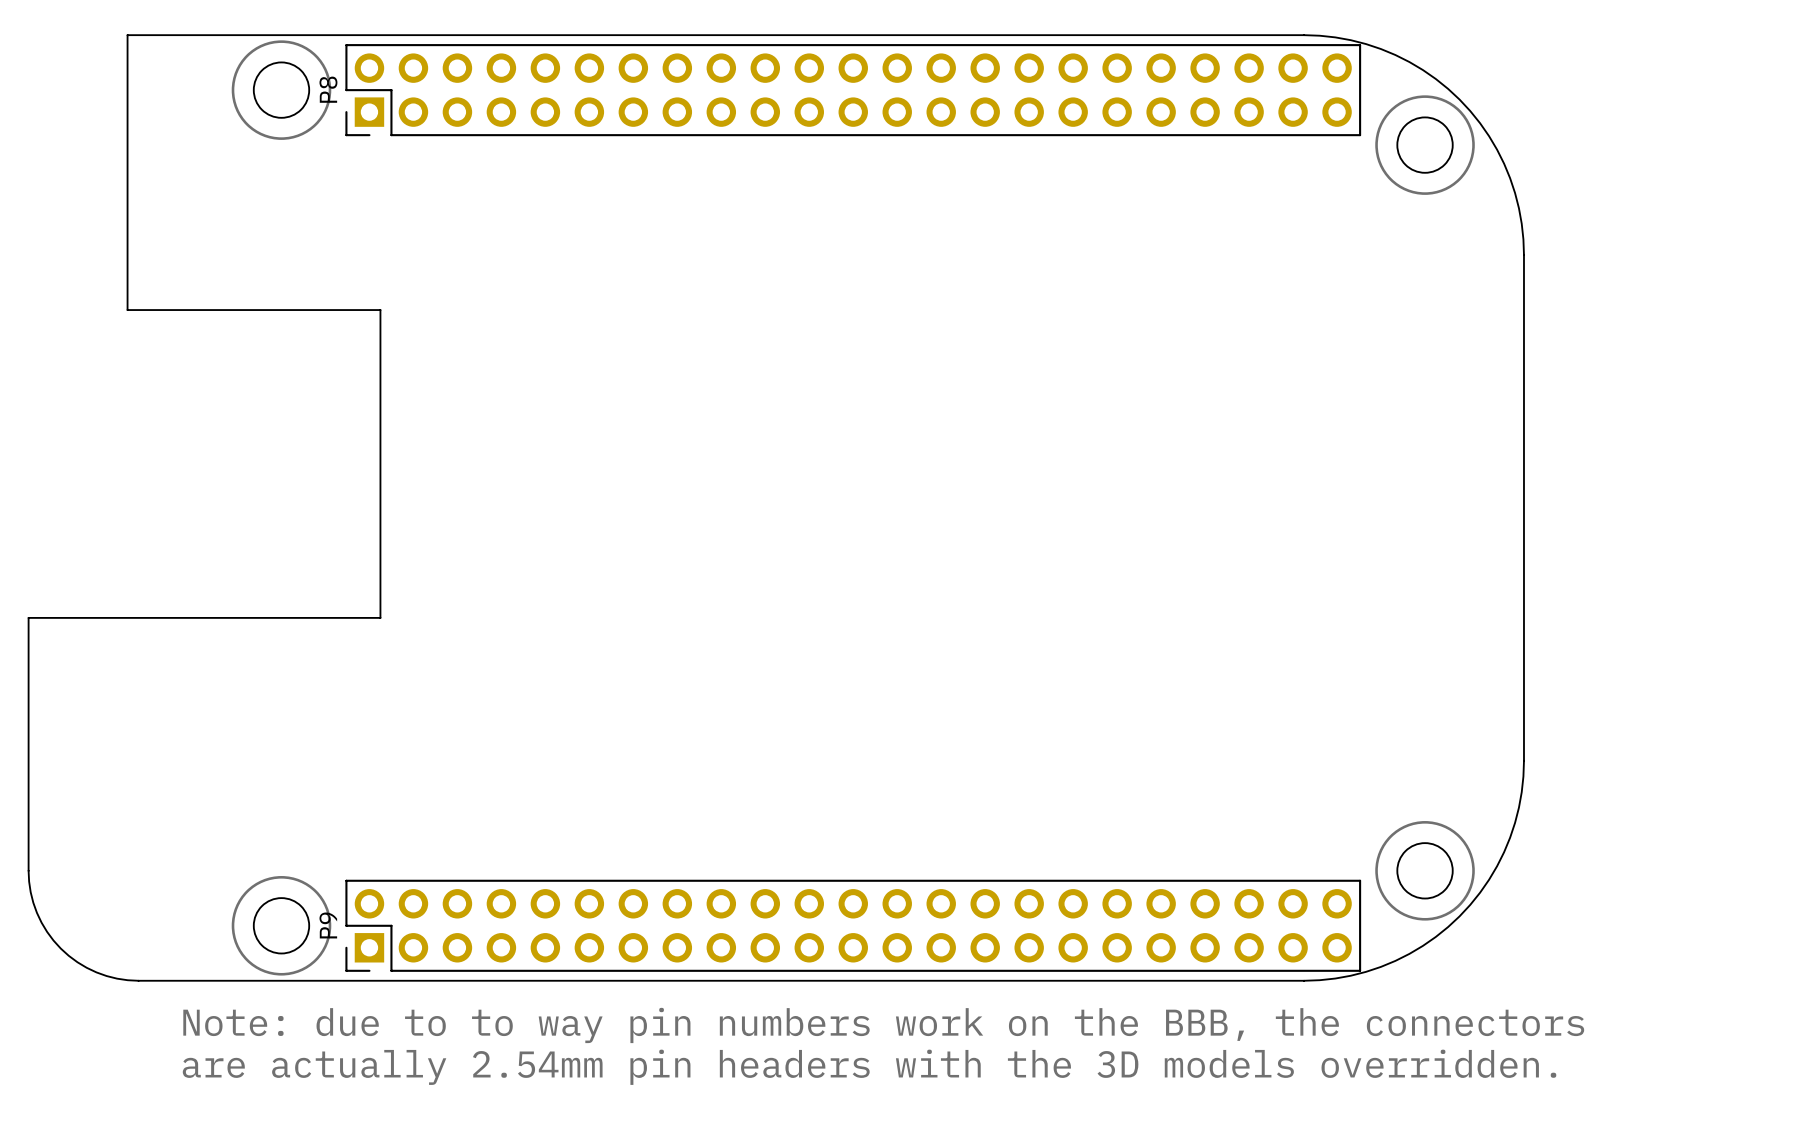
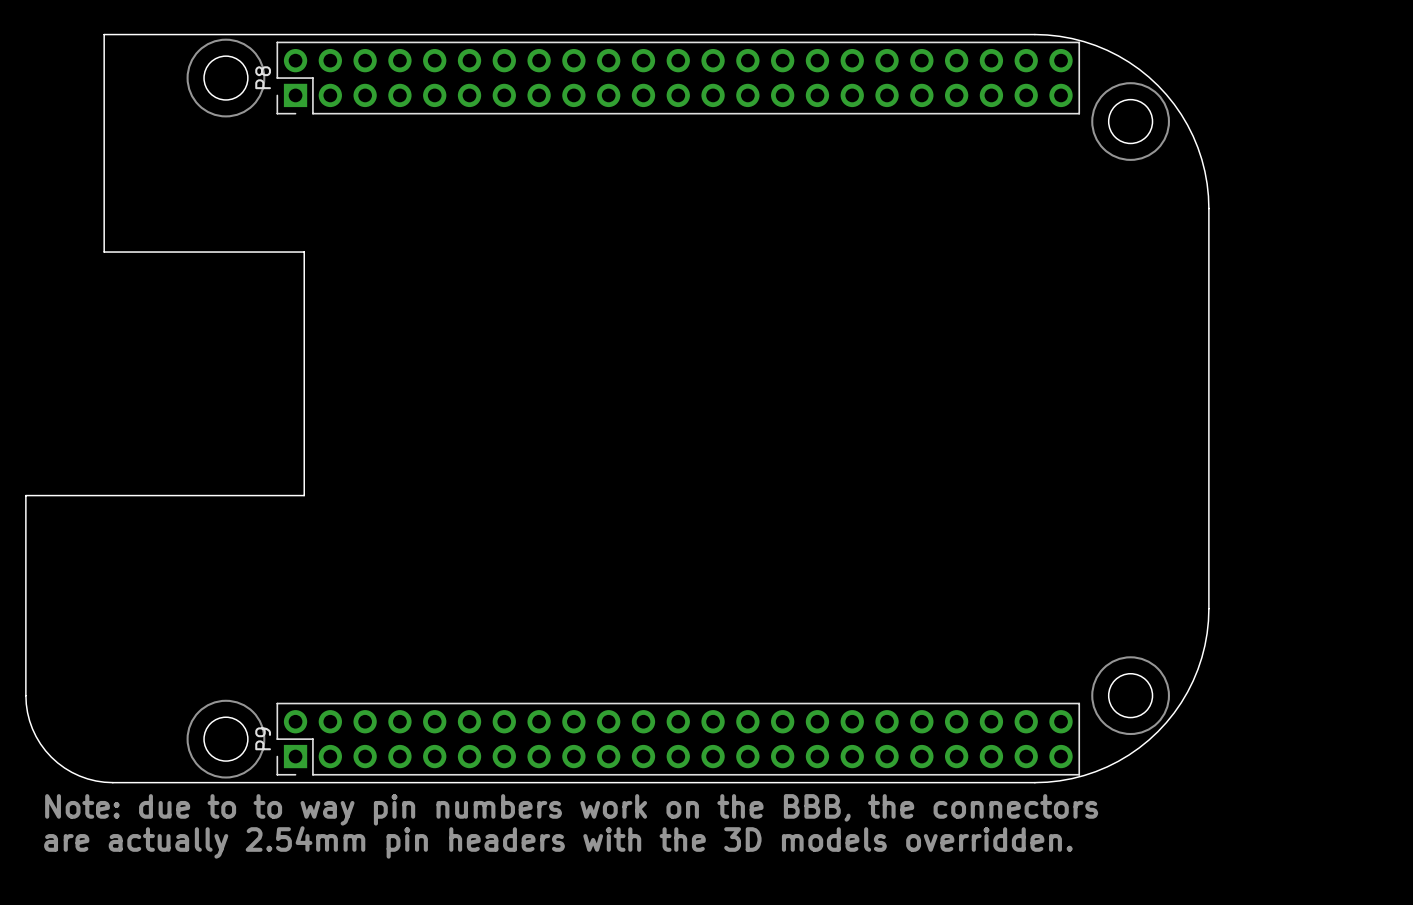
text position: Note: due to to way pin numbers work on the BBB, the connectors (883, 1025) -> Note: due to to way pin numbers work on the BBB, the connectors (571, 809)
text position: are actually 2.54mm pin headers with the 3D models overridden. (869, 1067) -> are actually 2.54mm pin headers with the 3D models overridden. (558, 842)

